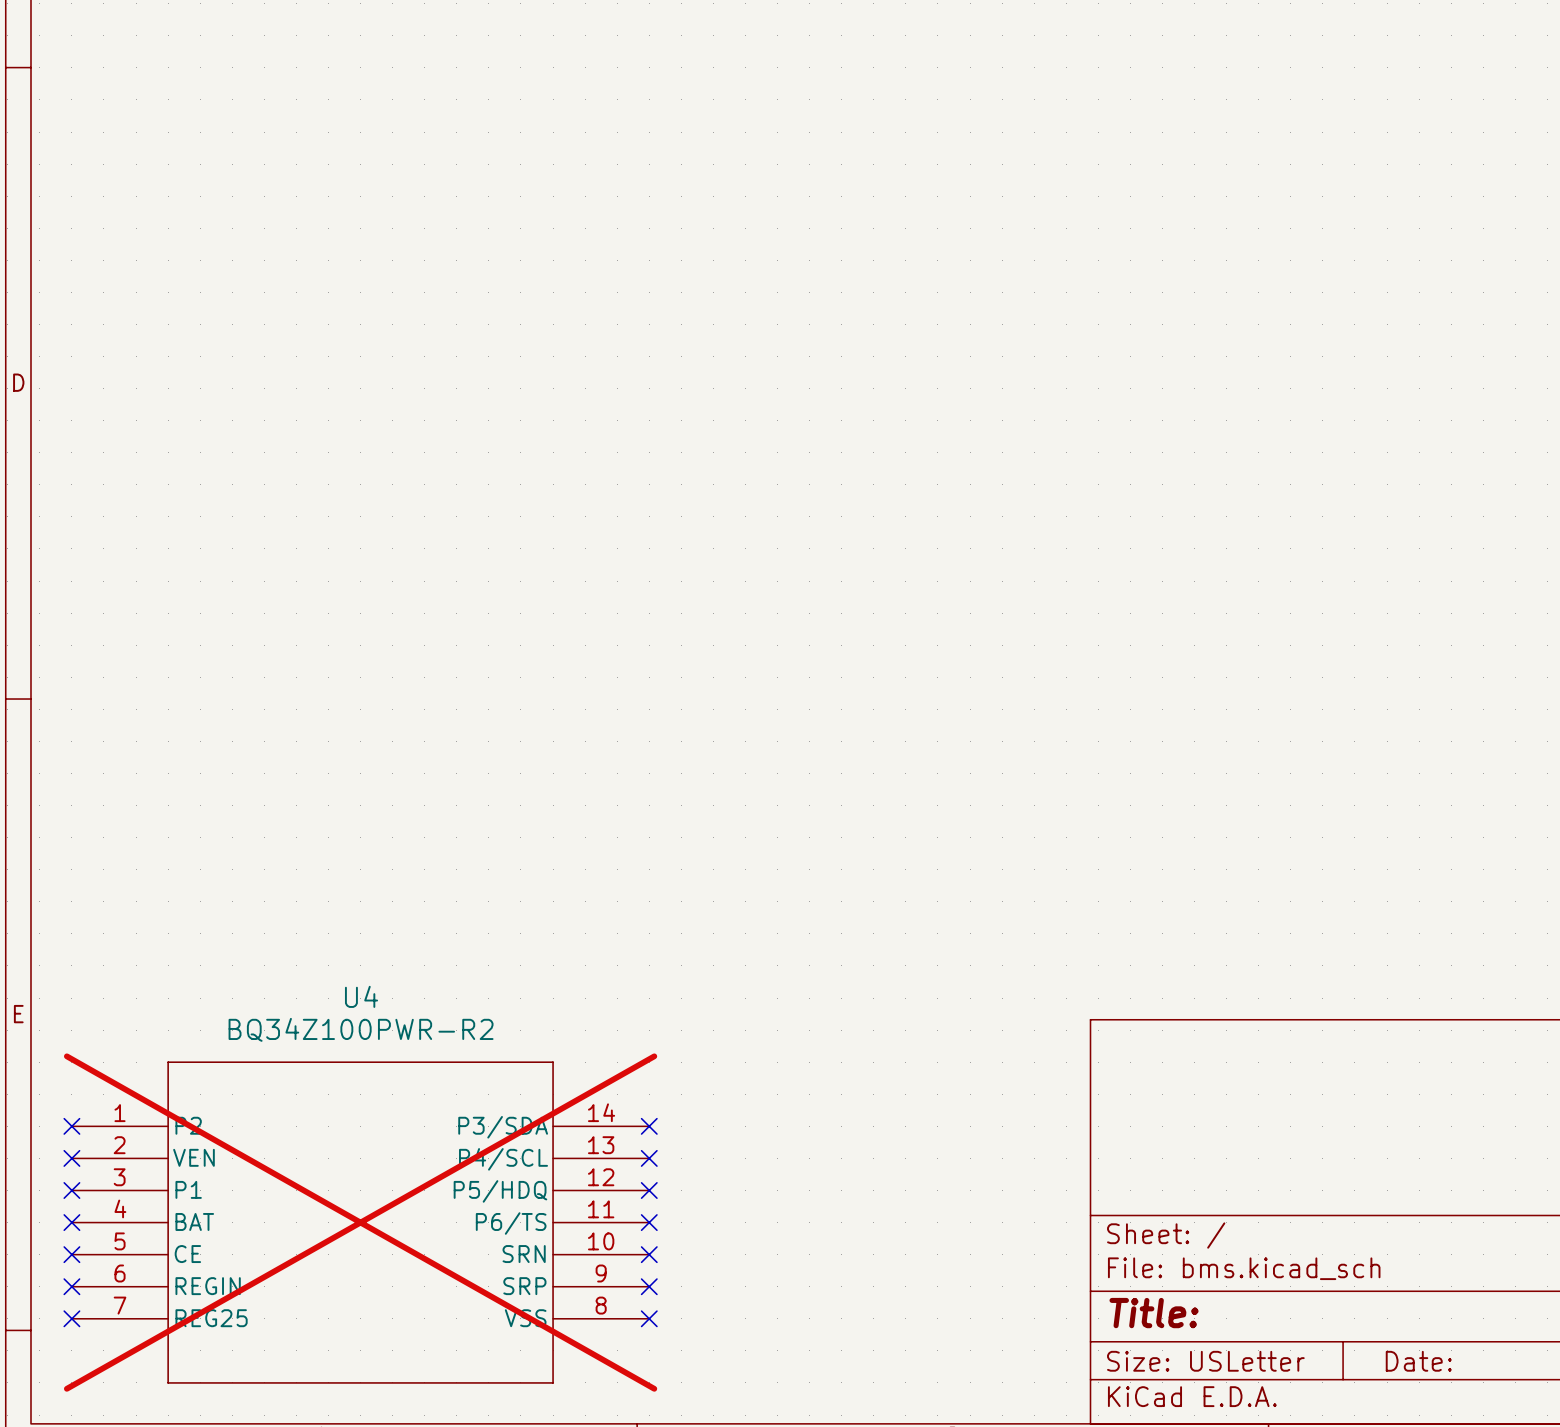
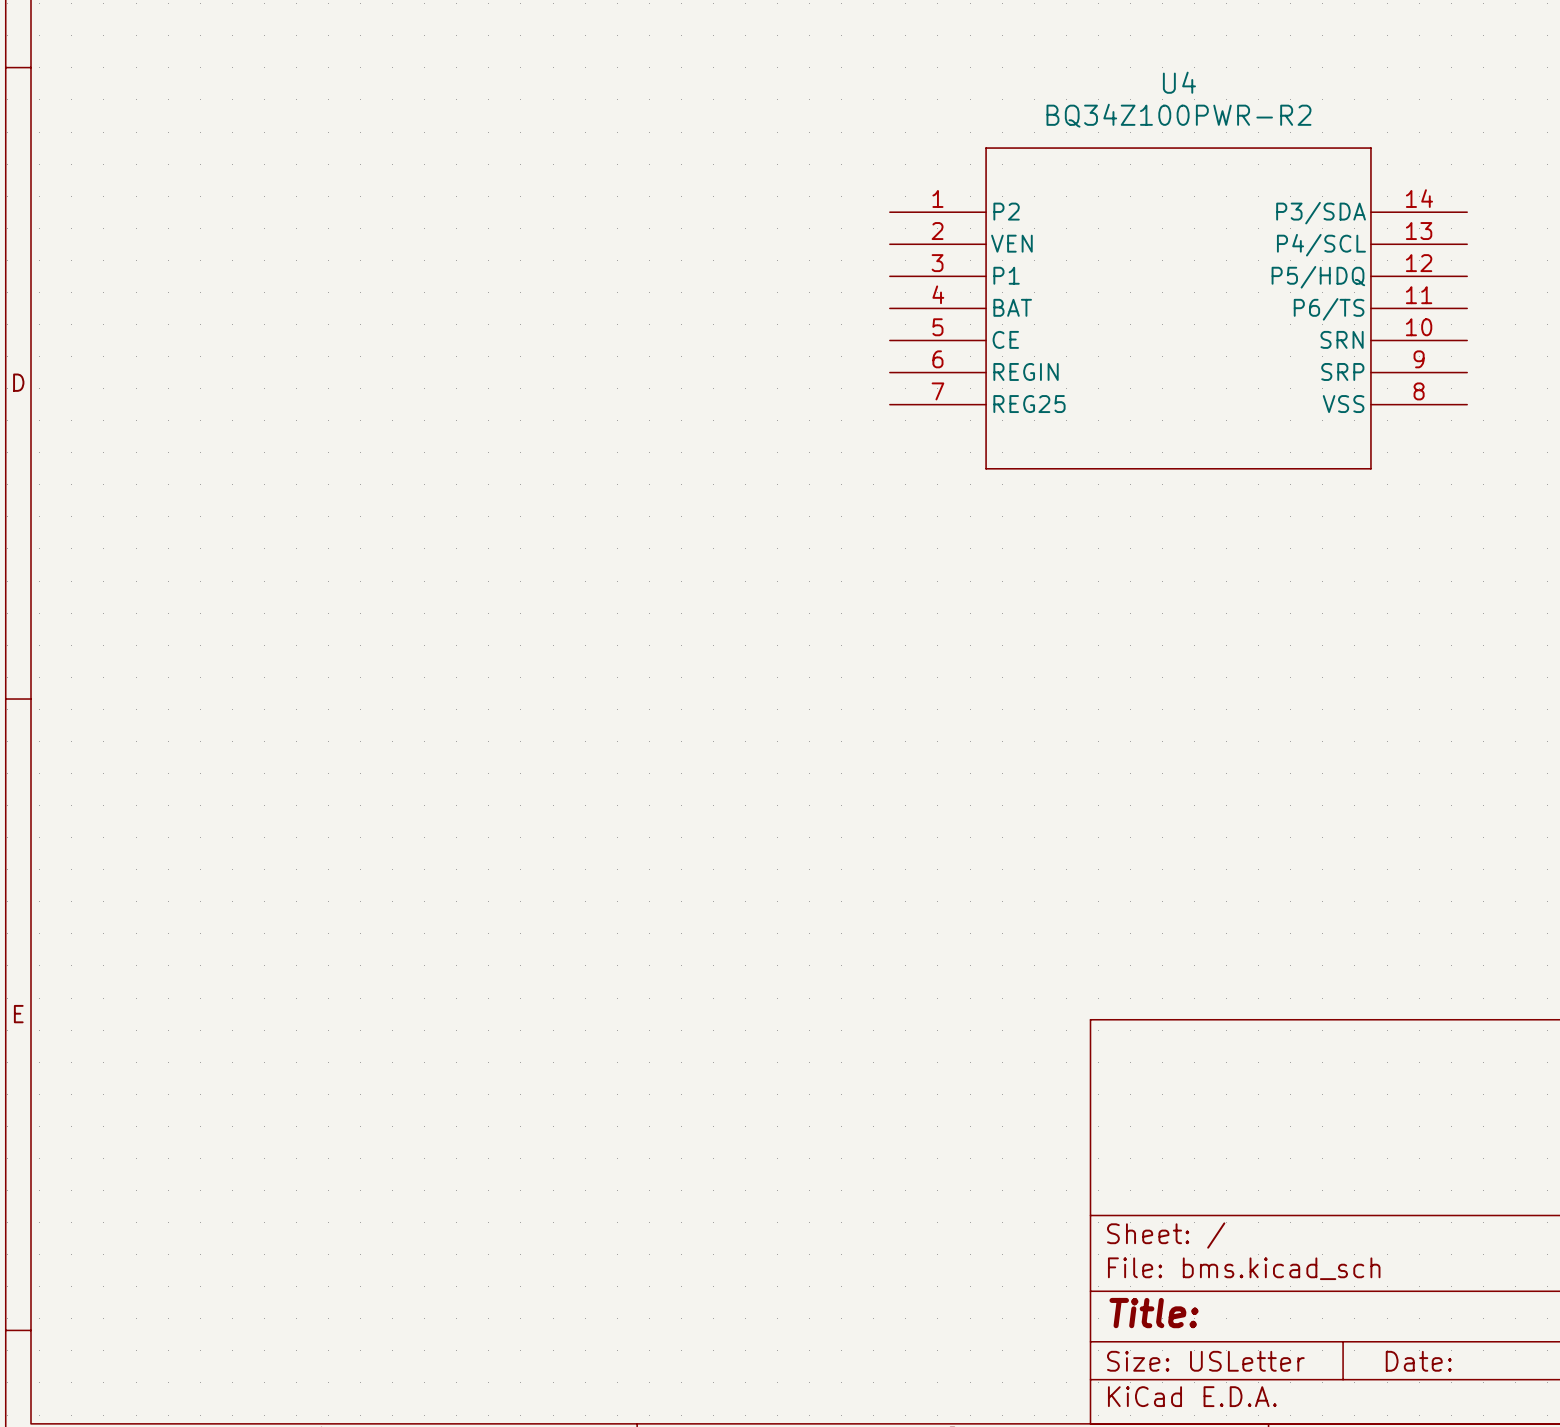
no-connect mark: (71, 1126) -> none
no-connect mark: (649, 1126) -> none
no-connect mark: (71, 1158) -> none
no-connect mark: (649, 1158) -> none
no-connect mark: (71, 1190) -> none
no-connect mark: (649, 1190) -> none
no-connect mark: (71, 1222) -> none
U4 position: (360, 1222) -> (1178, 308)
U4 do-not-place cross: (360, 1222) -> none
no-connect mark: (649, 1222) -> none
no-connect mark: (71, 1254) -> none
no-connect mark: (649, 1254) -> none
no-connect mark: (71, 1286) -> none
no-connect mark: (649, 1286) -> none
no-connect mark: (71, 1318) -> none
no-connect mark: (649, 1318) -> none

